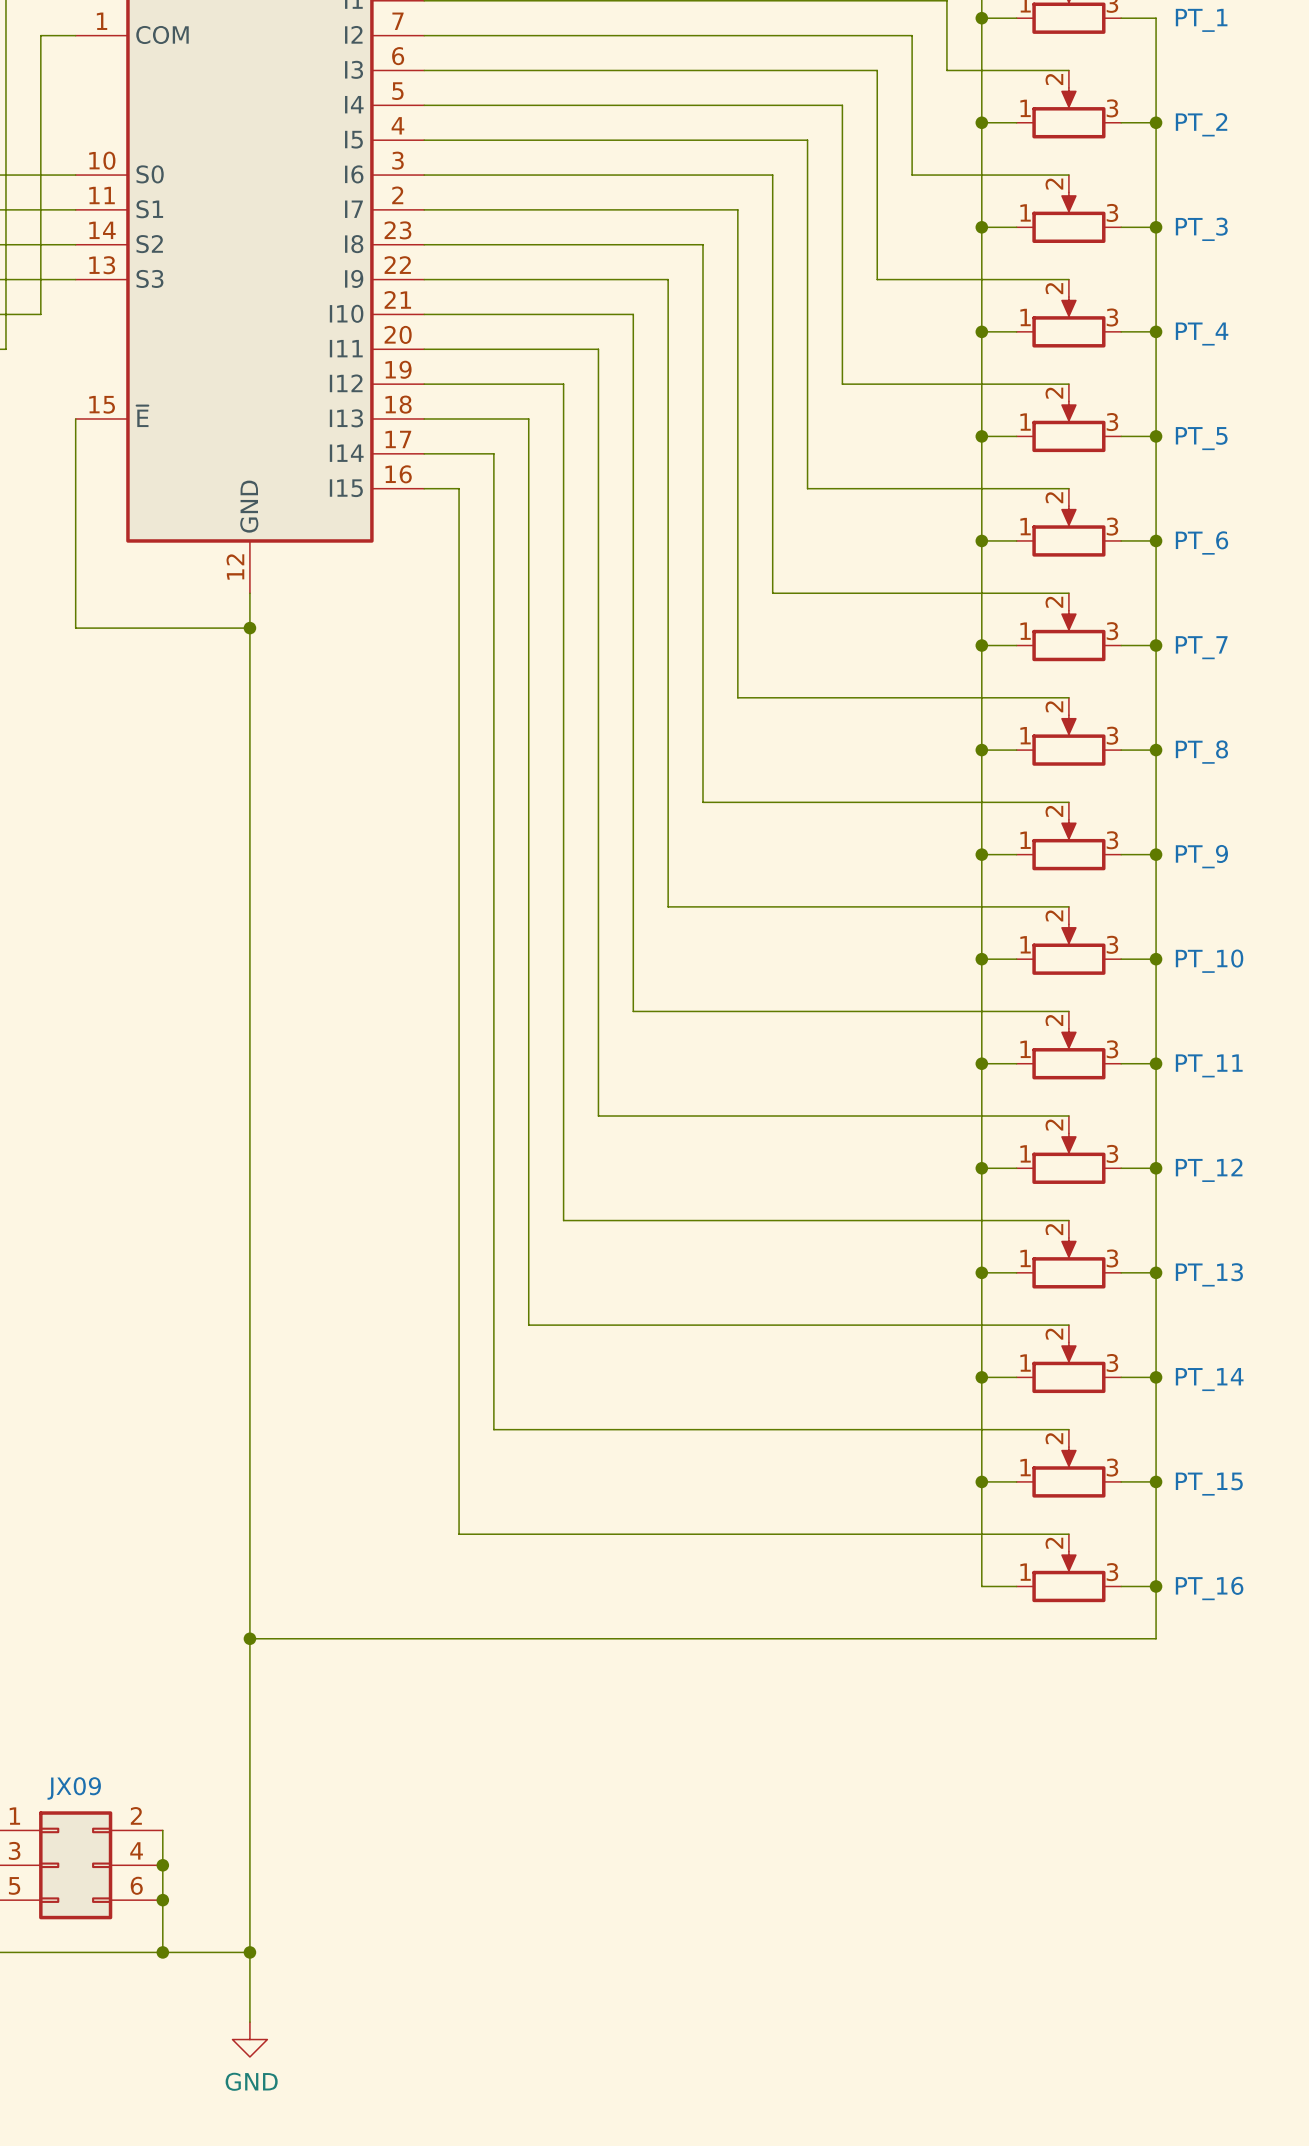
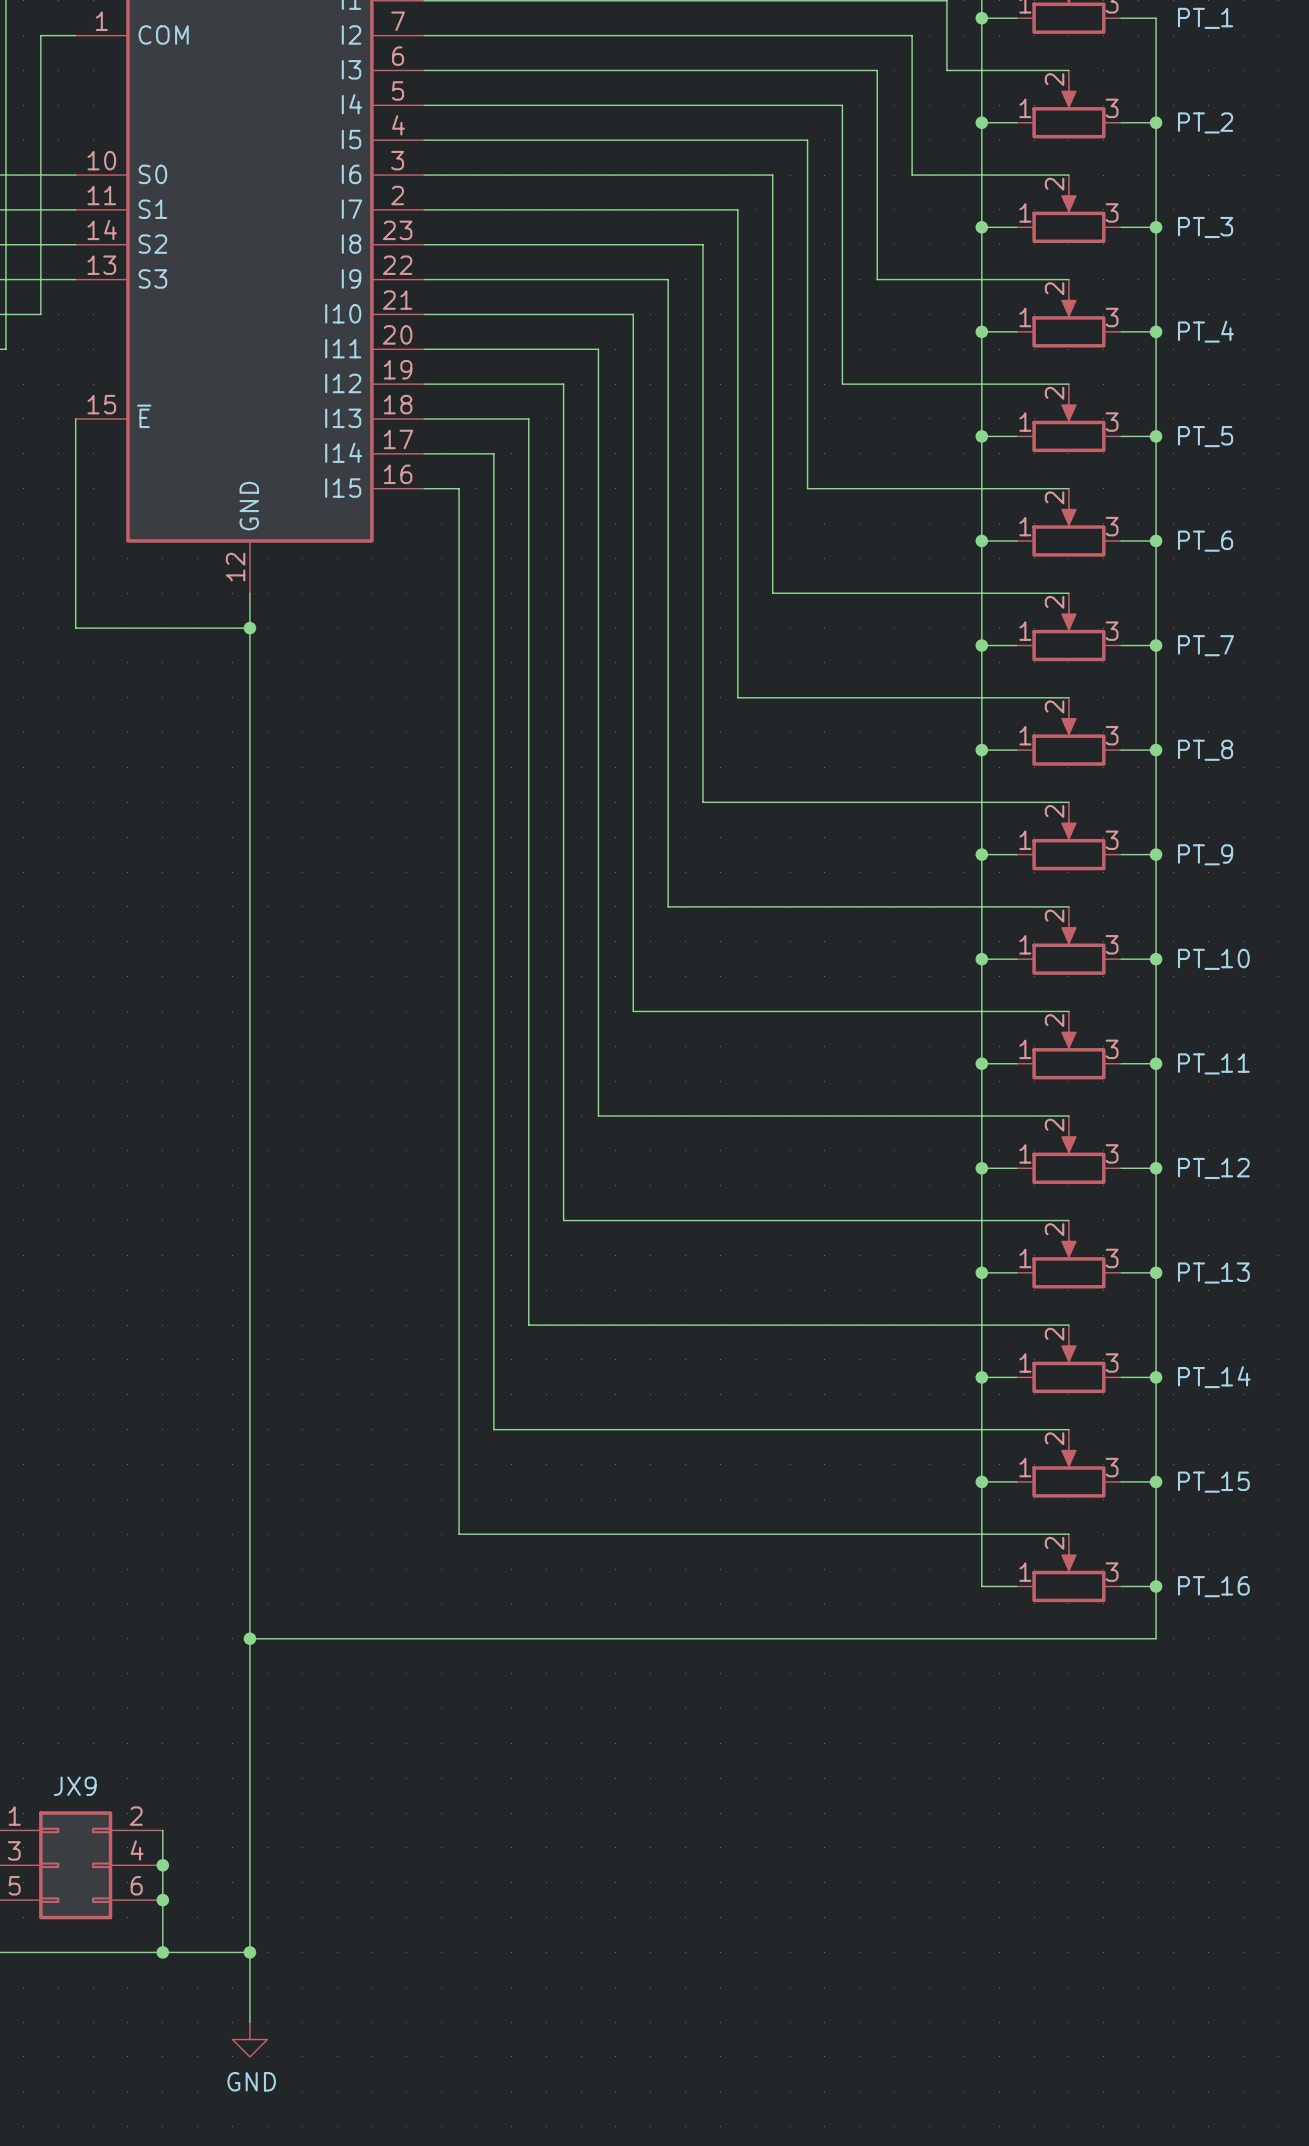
JX09 name: JX09 (74, 1788) -> JX9 (75, 1786)

